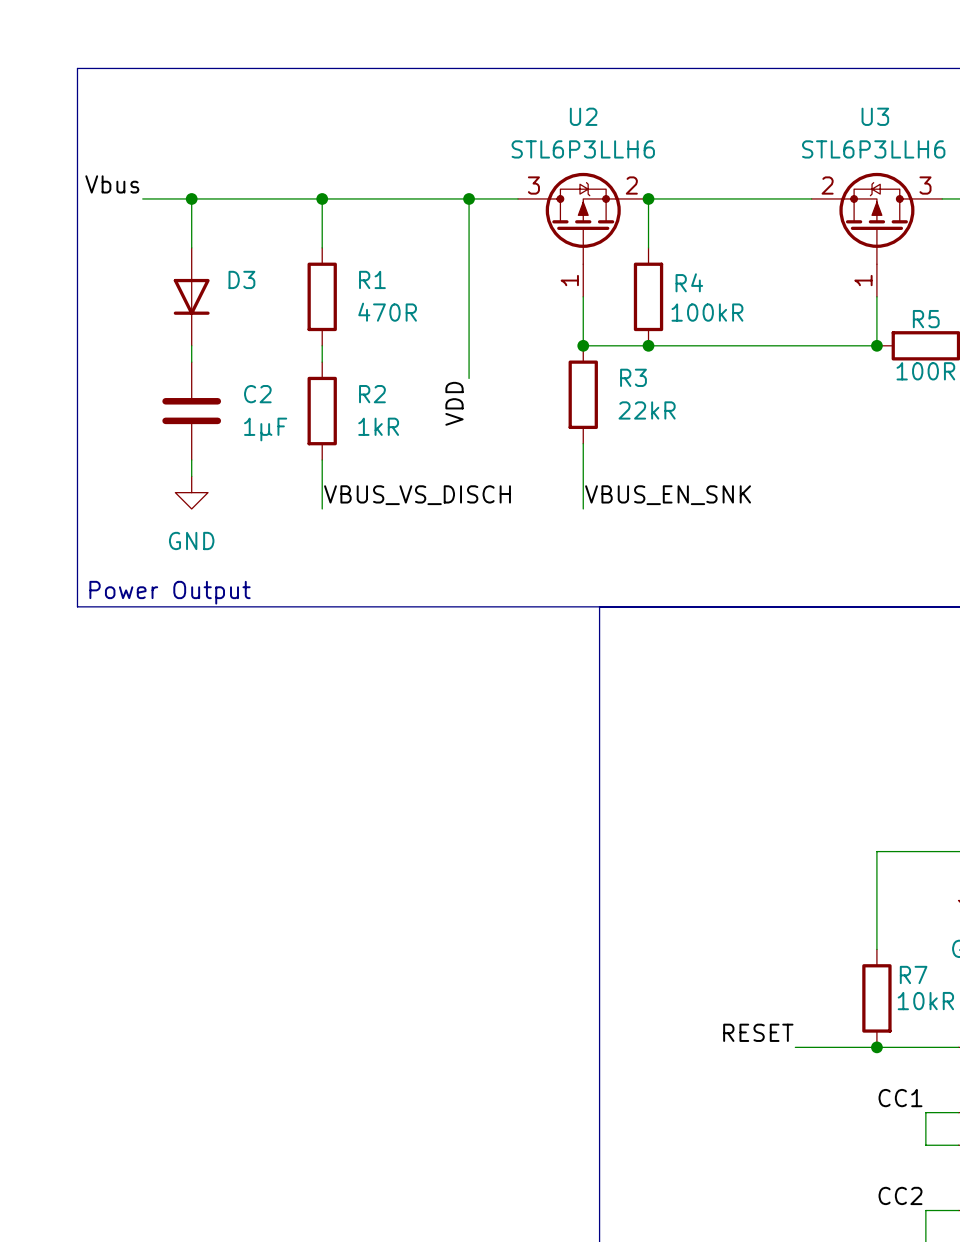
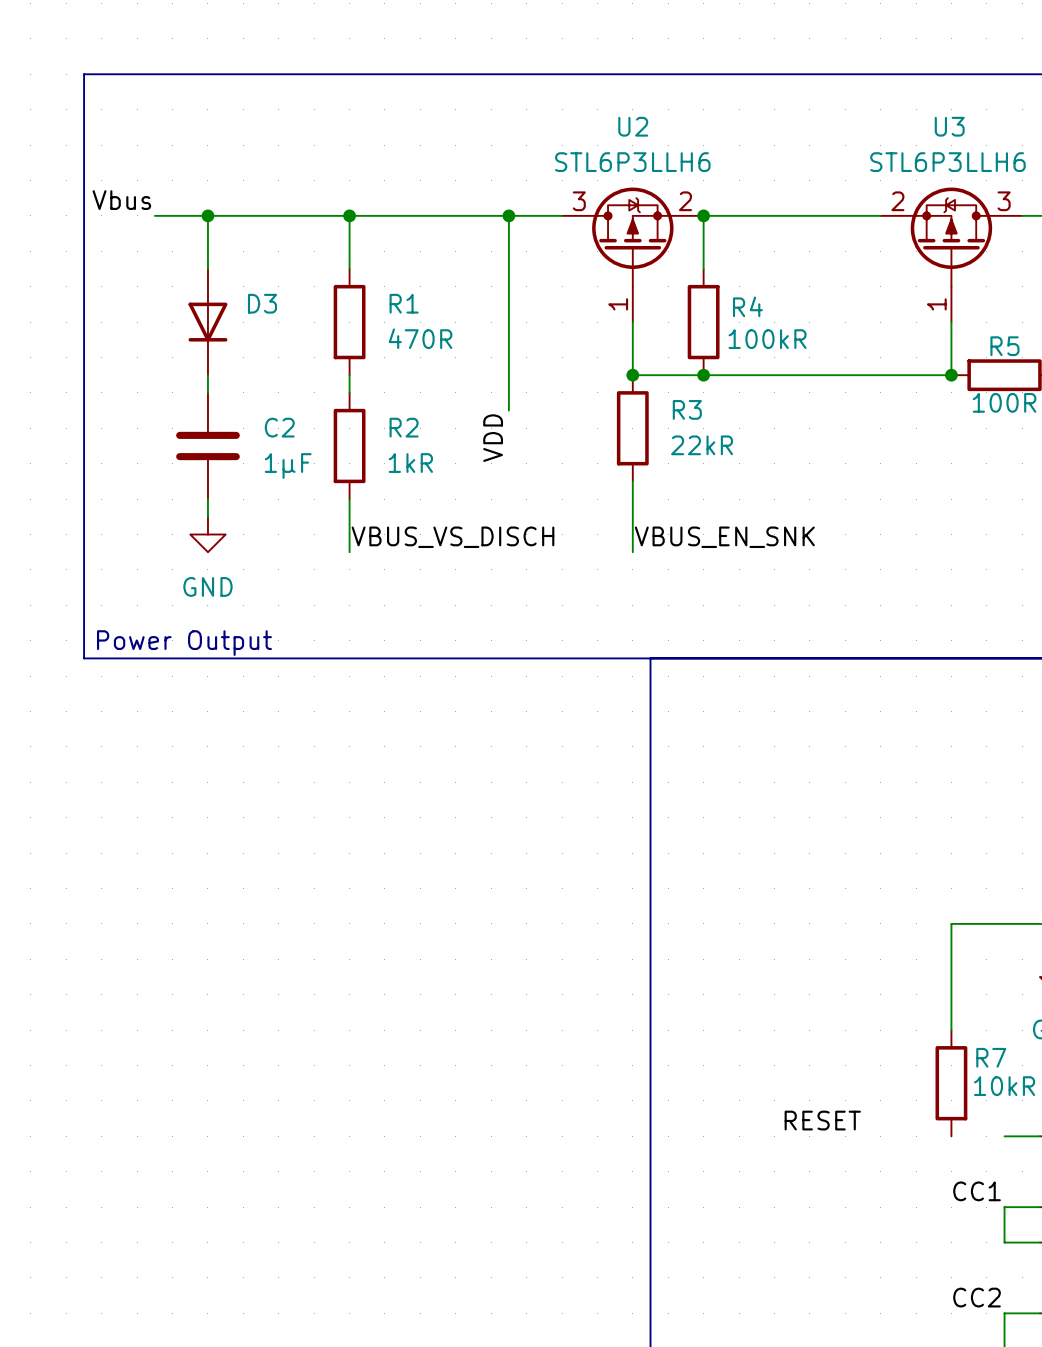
wire: (795, 1047) (925, 1047) -> none
junction: (876, 1047) -> none

